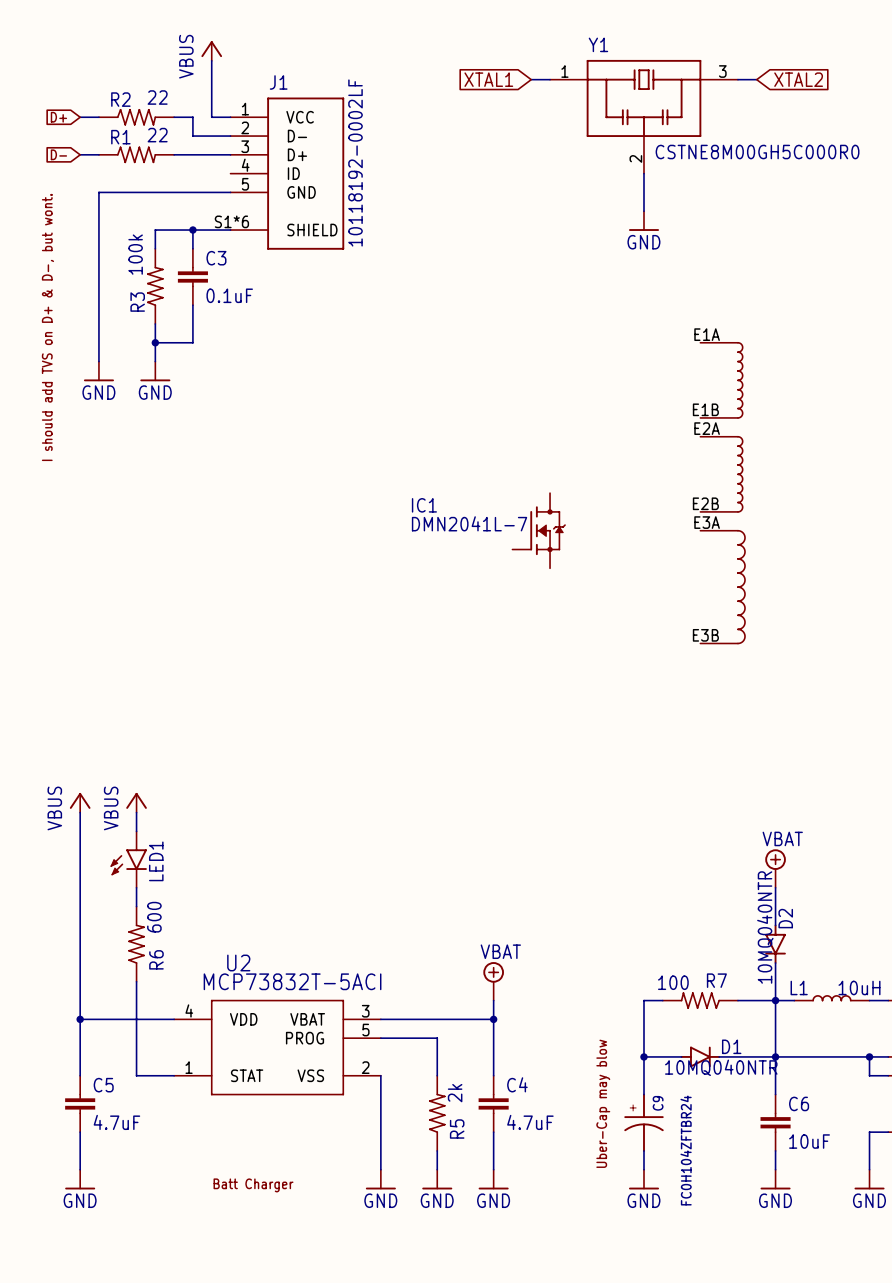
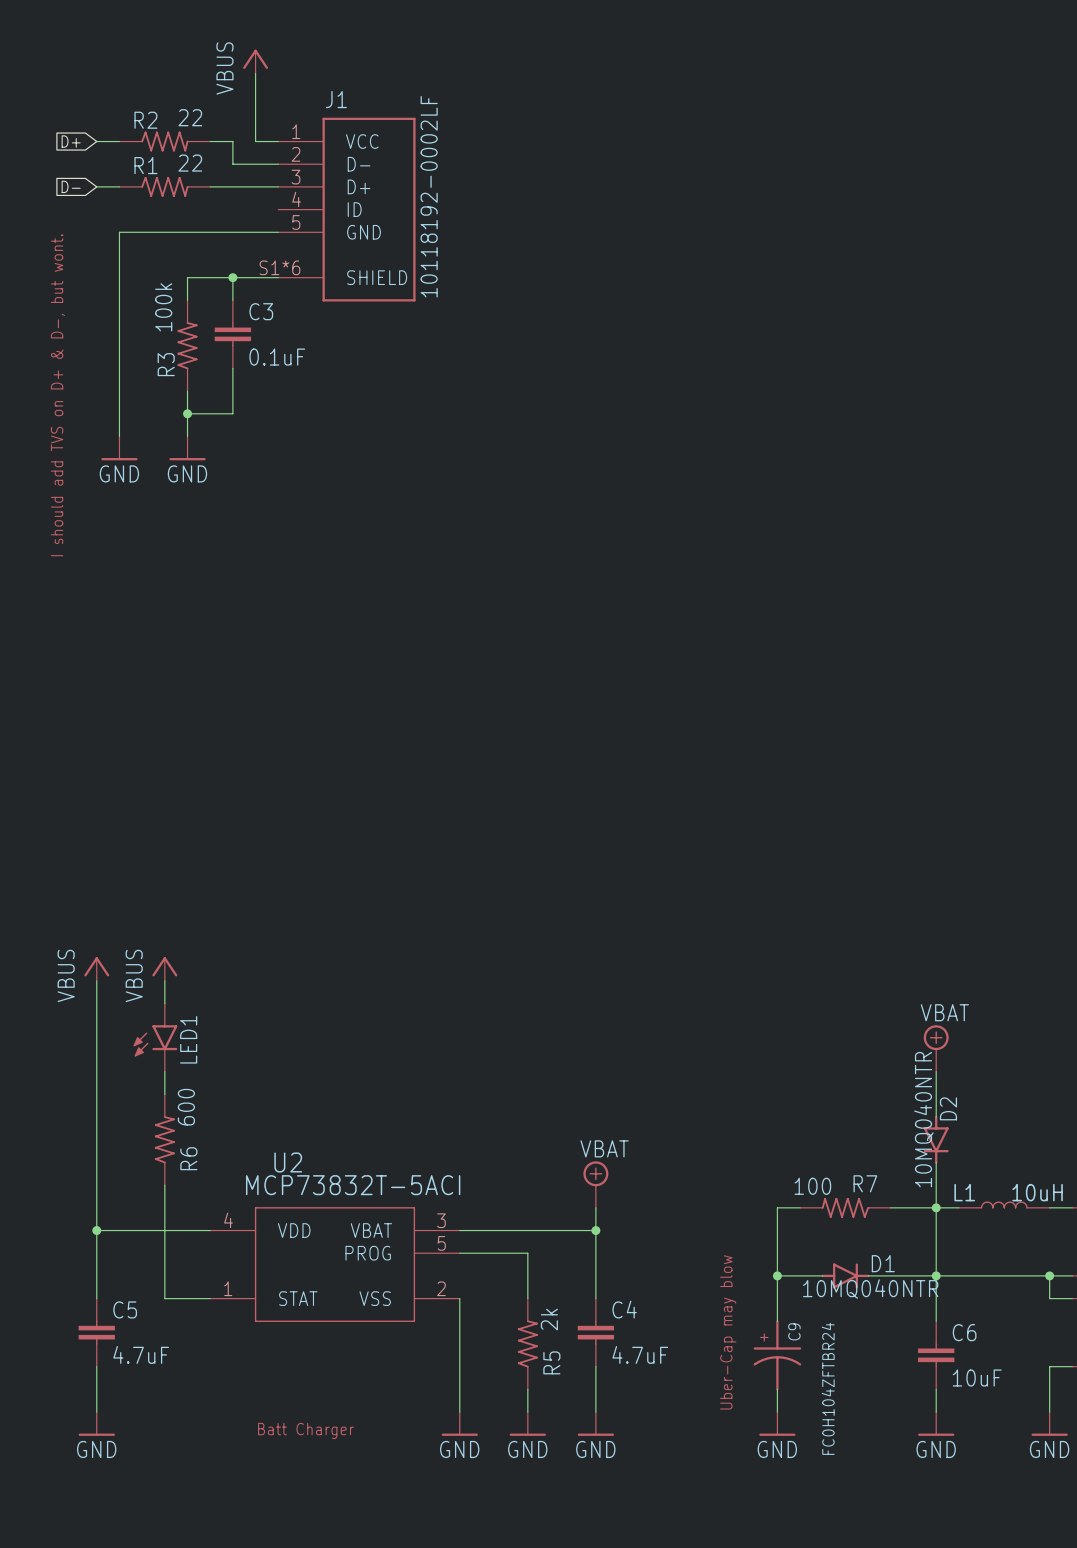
global label: XTAL1 (488, 79) -> none
wire: (531, 79) (550, 79) -> none
wire: (737, 79) (756, 79) -> none
global label: XTAL2 (798, 79) -> none
Y1: CSTNE8M00GH5C000R0 (643, 116) -> none
wire: (643, 173) (643, 211) -> none
power symbol: GND (643, 221) -> none
part: (721, 380) -> none
part: (721, 474) -> none
IC1: DMN2041L-7 (539, 530) -> none
part: (722, 587) -> none

